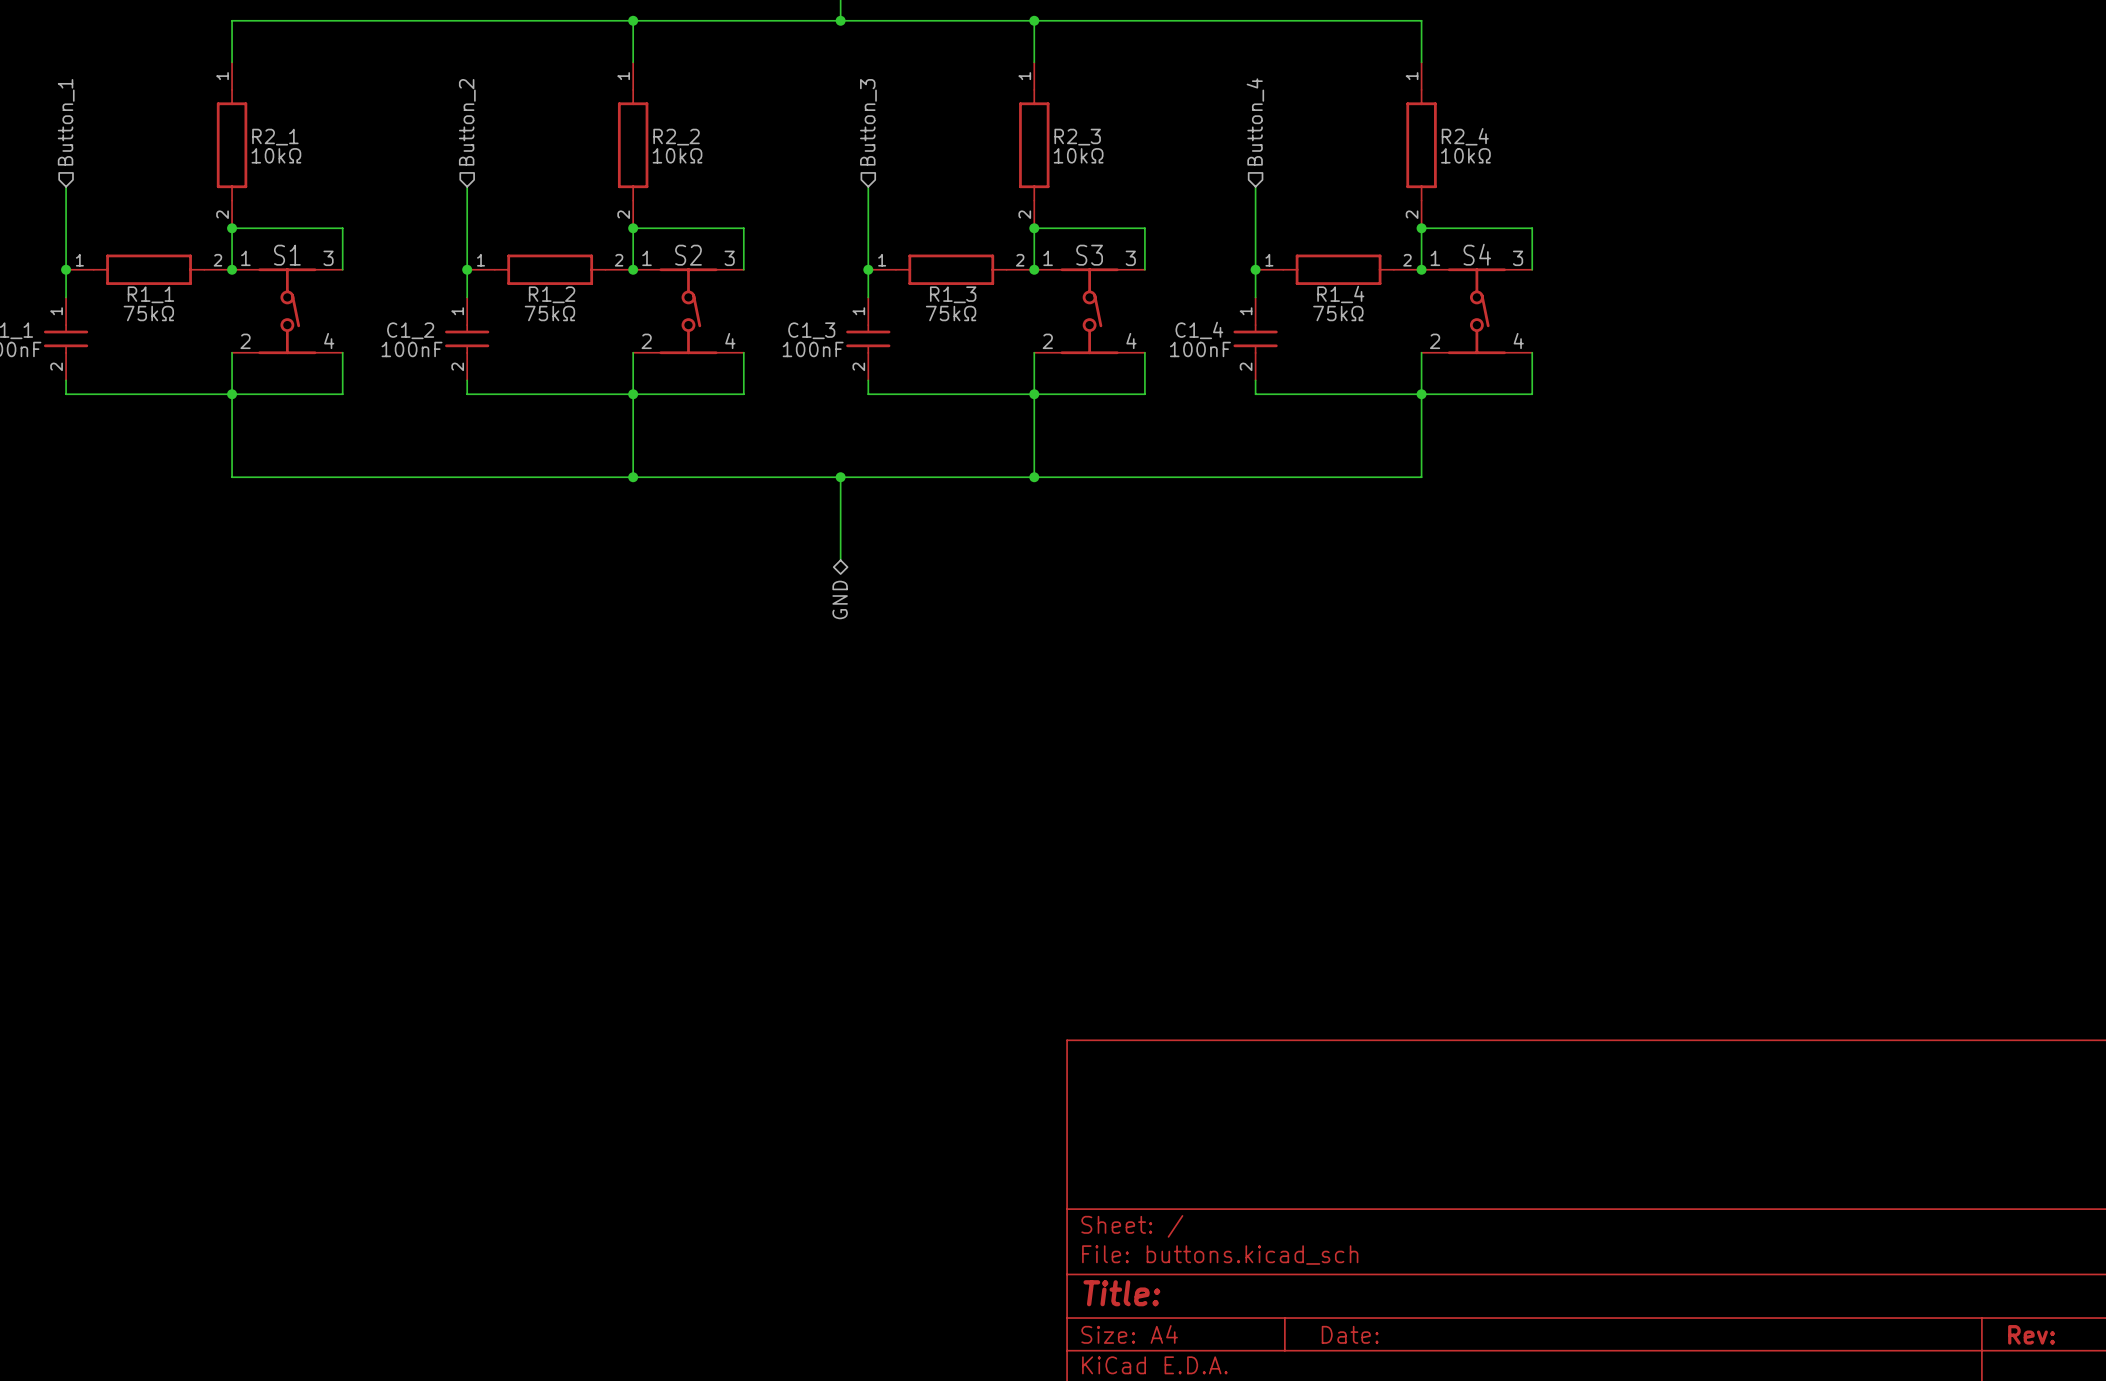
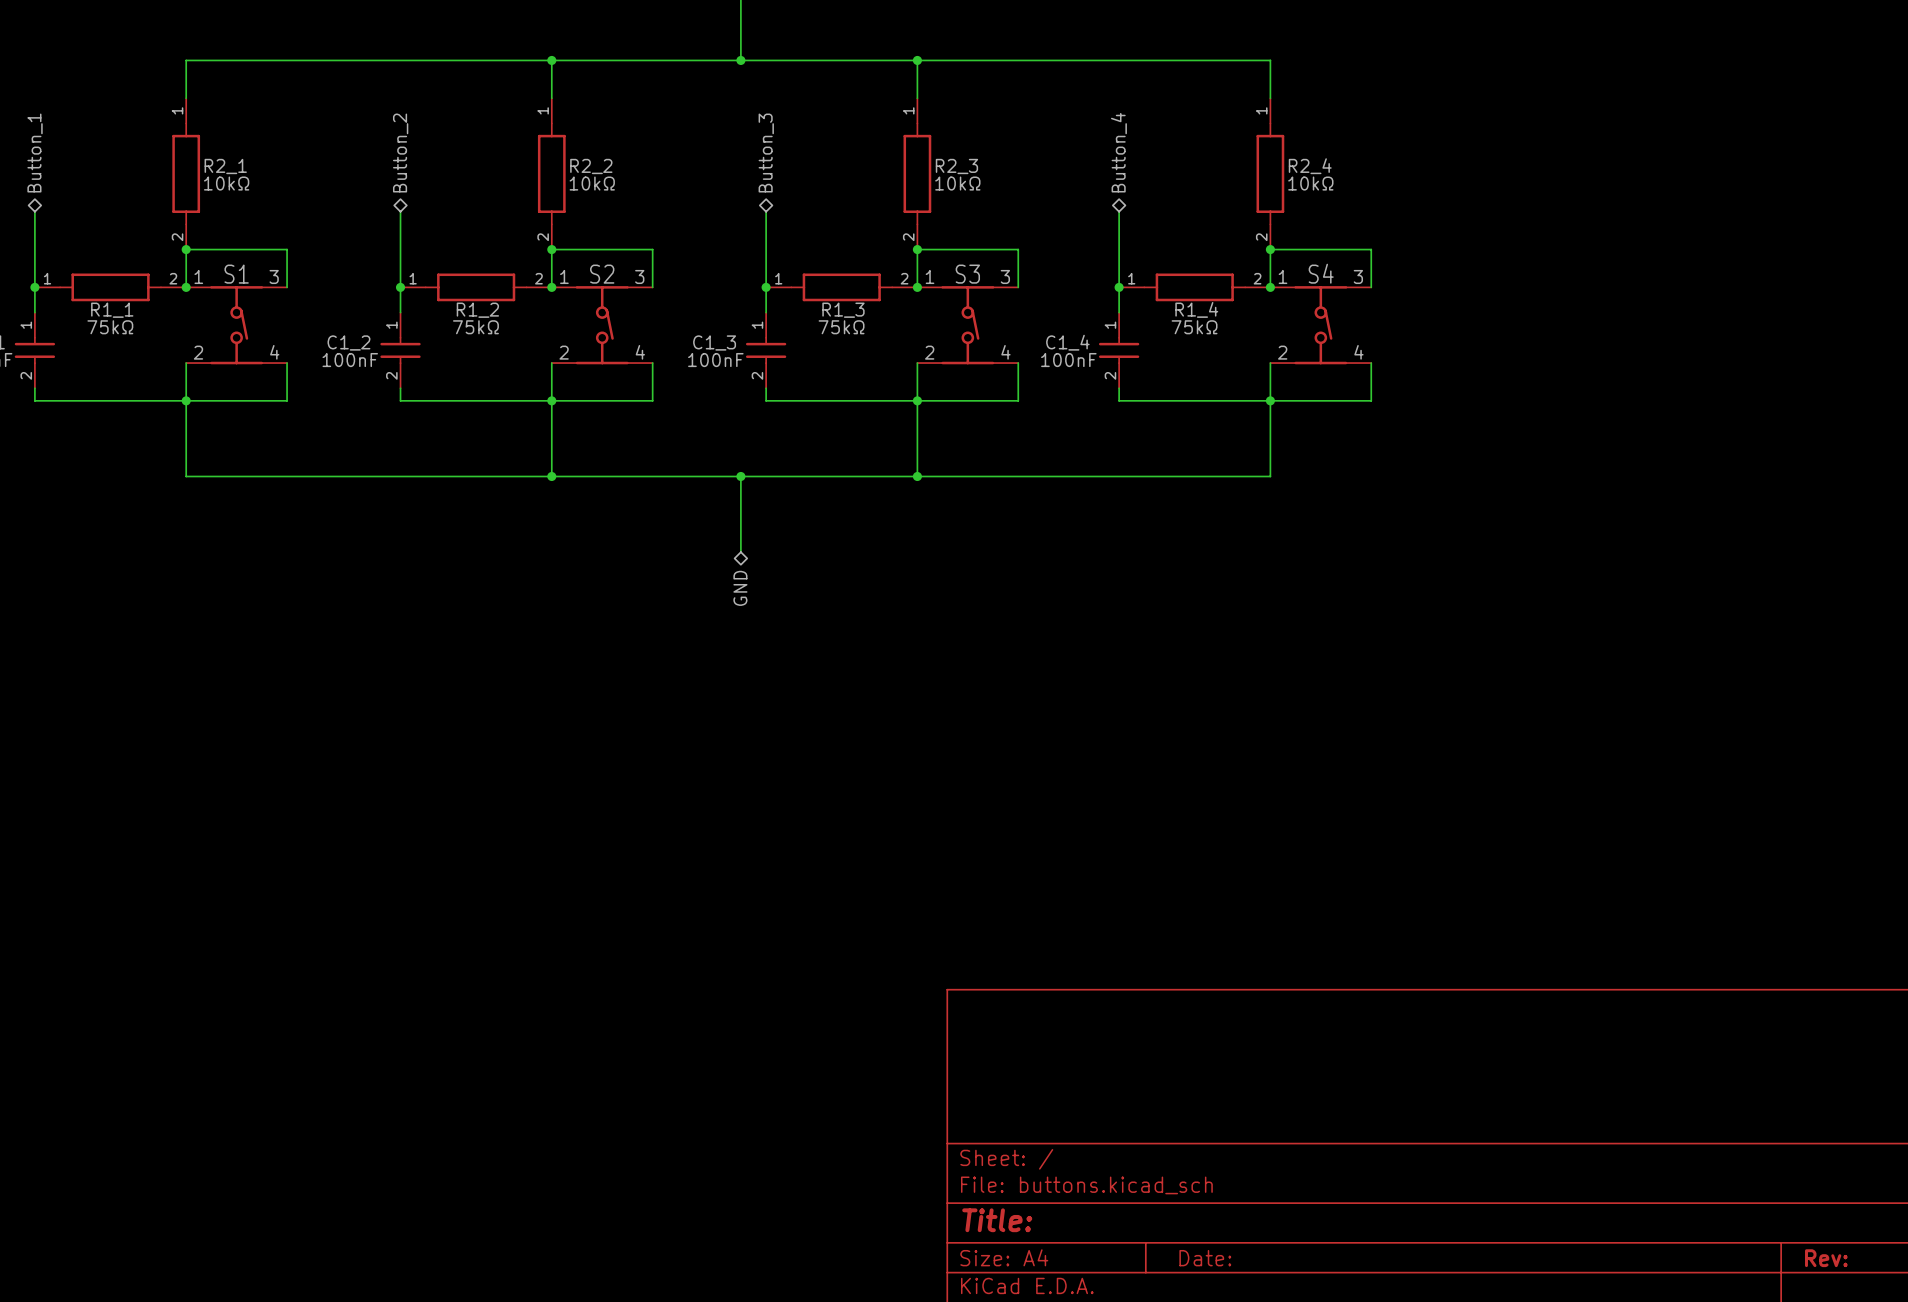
hierarchical label shape: input (66, 122) -> bidirectional (35, 153)
hierarchical label shape: input (467, 122) -> bidirectional (400, 153)
hierarchical label shape: input (868, 122) -> bidirectional (766, 153)
hierarchical label shape: input (1255, 122) -> bidirectional (1118, 152)

